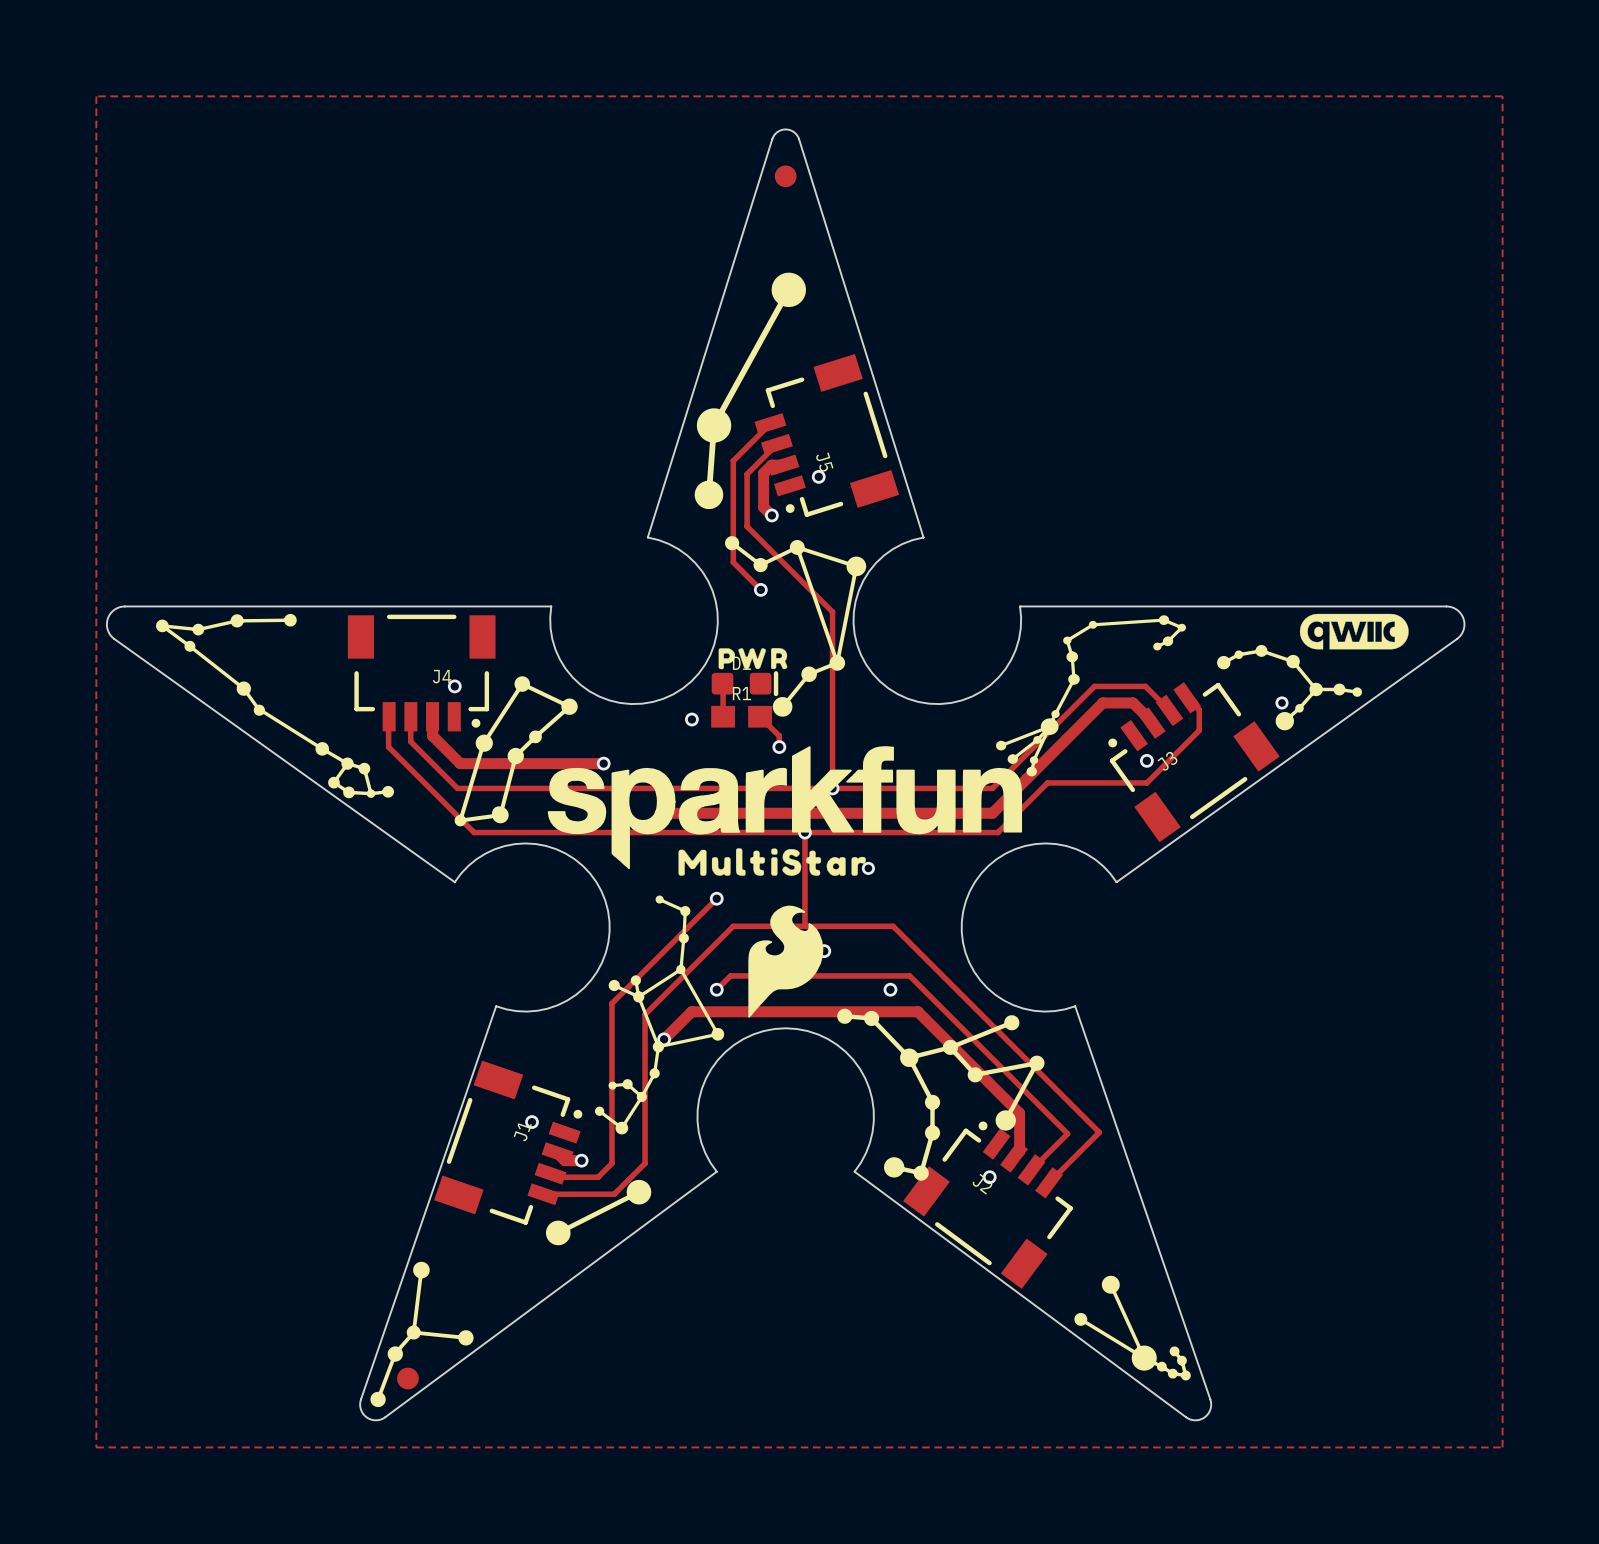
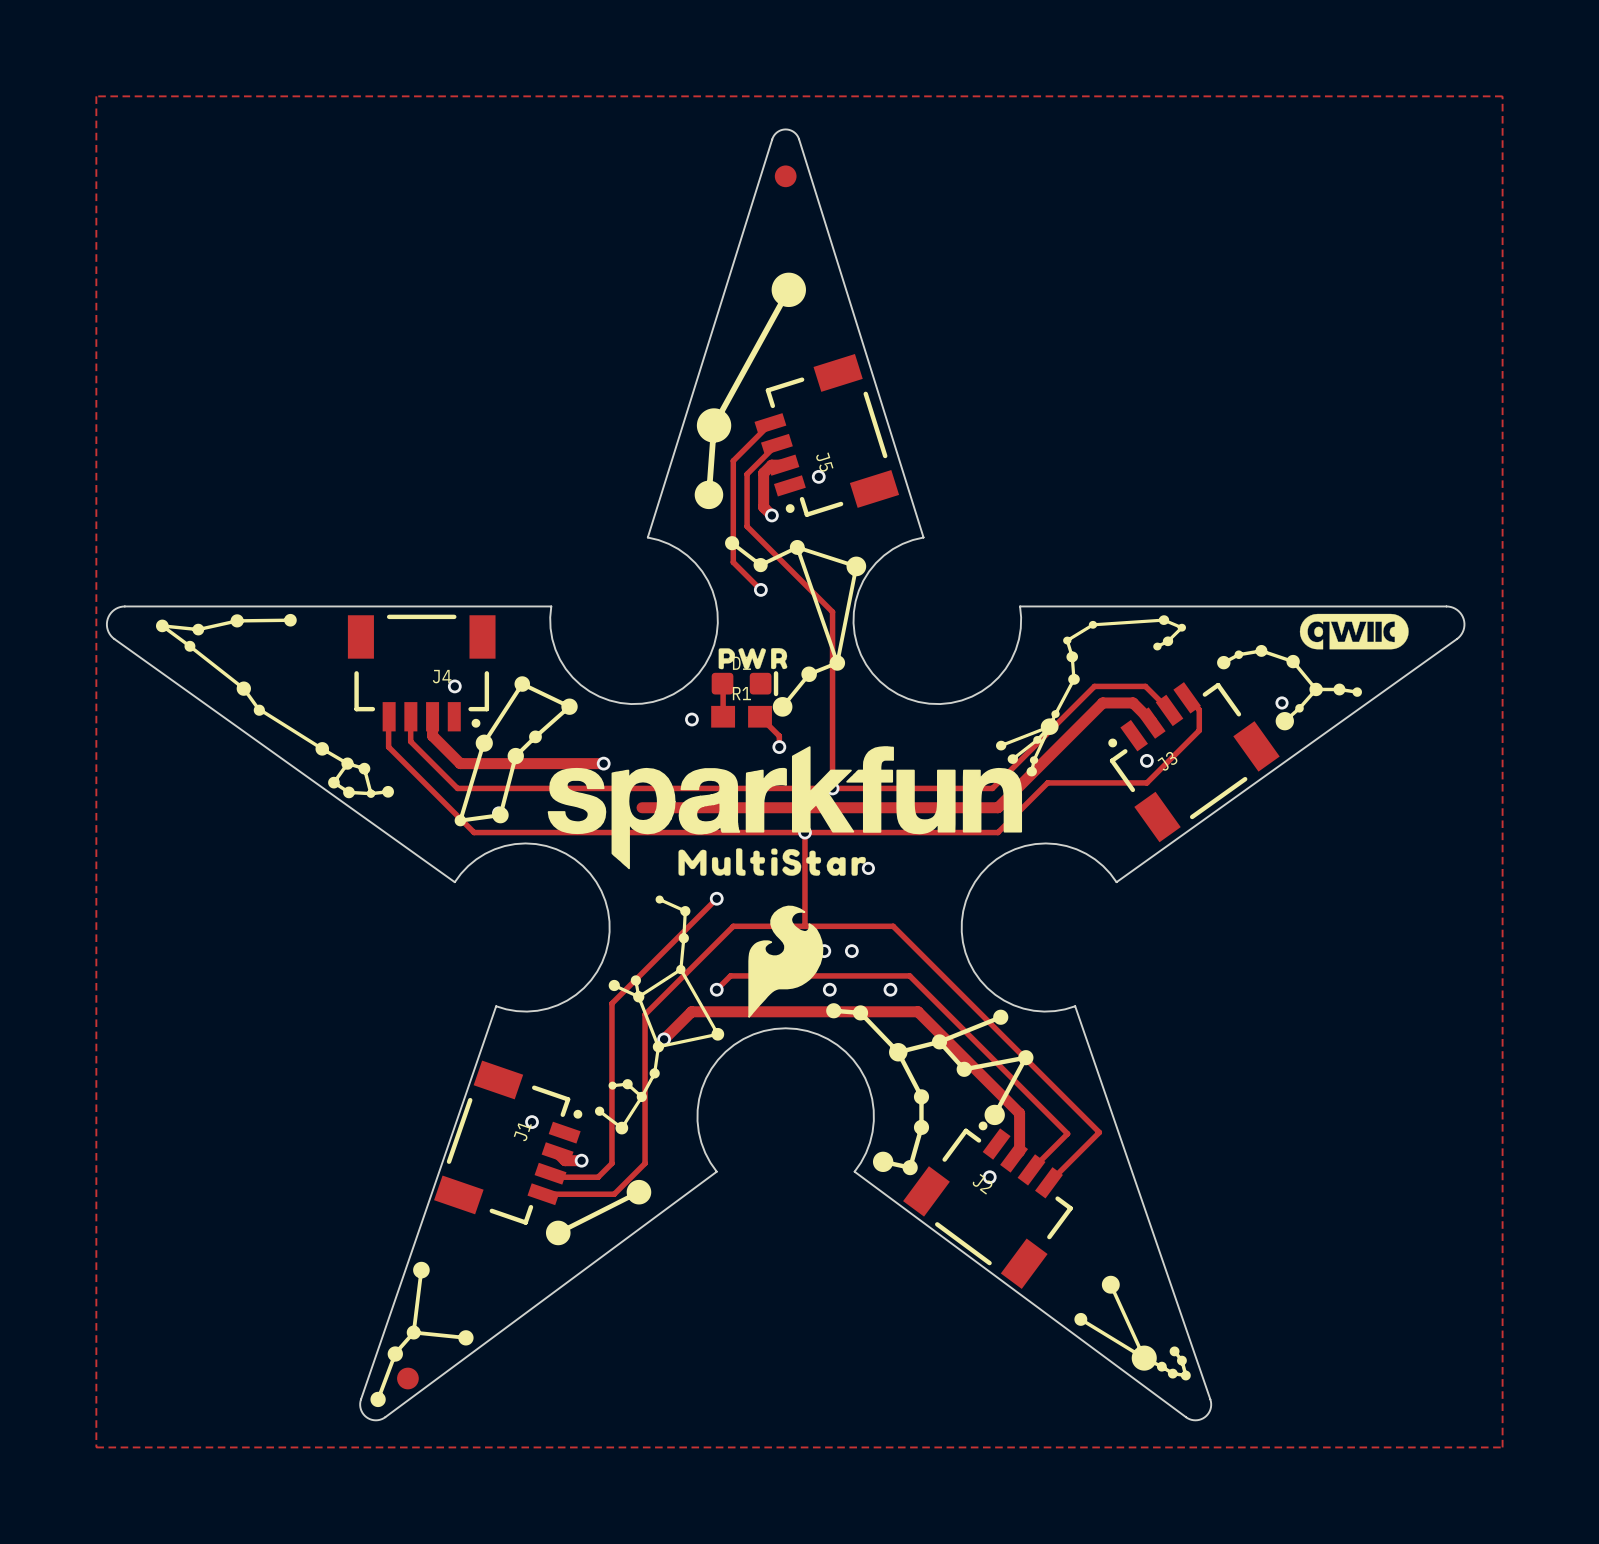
track: (997, 807) (992, 813) (664, 813) -> (997, 807) (642, 807)
via: none -> (851, 951)
via: none -> (829, 989)
drawing position: (940, 1094) -> (929, 1089)

